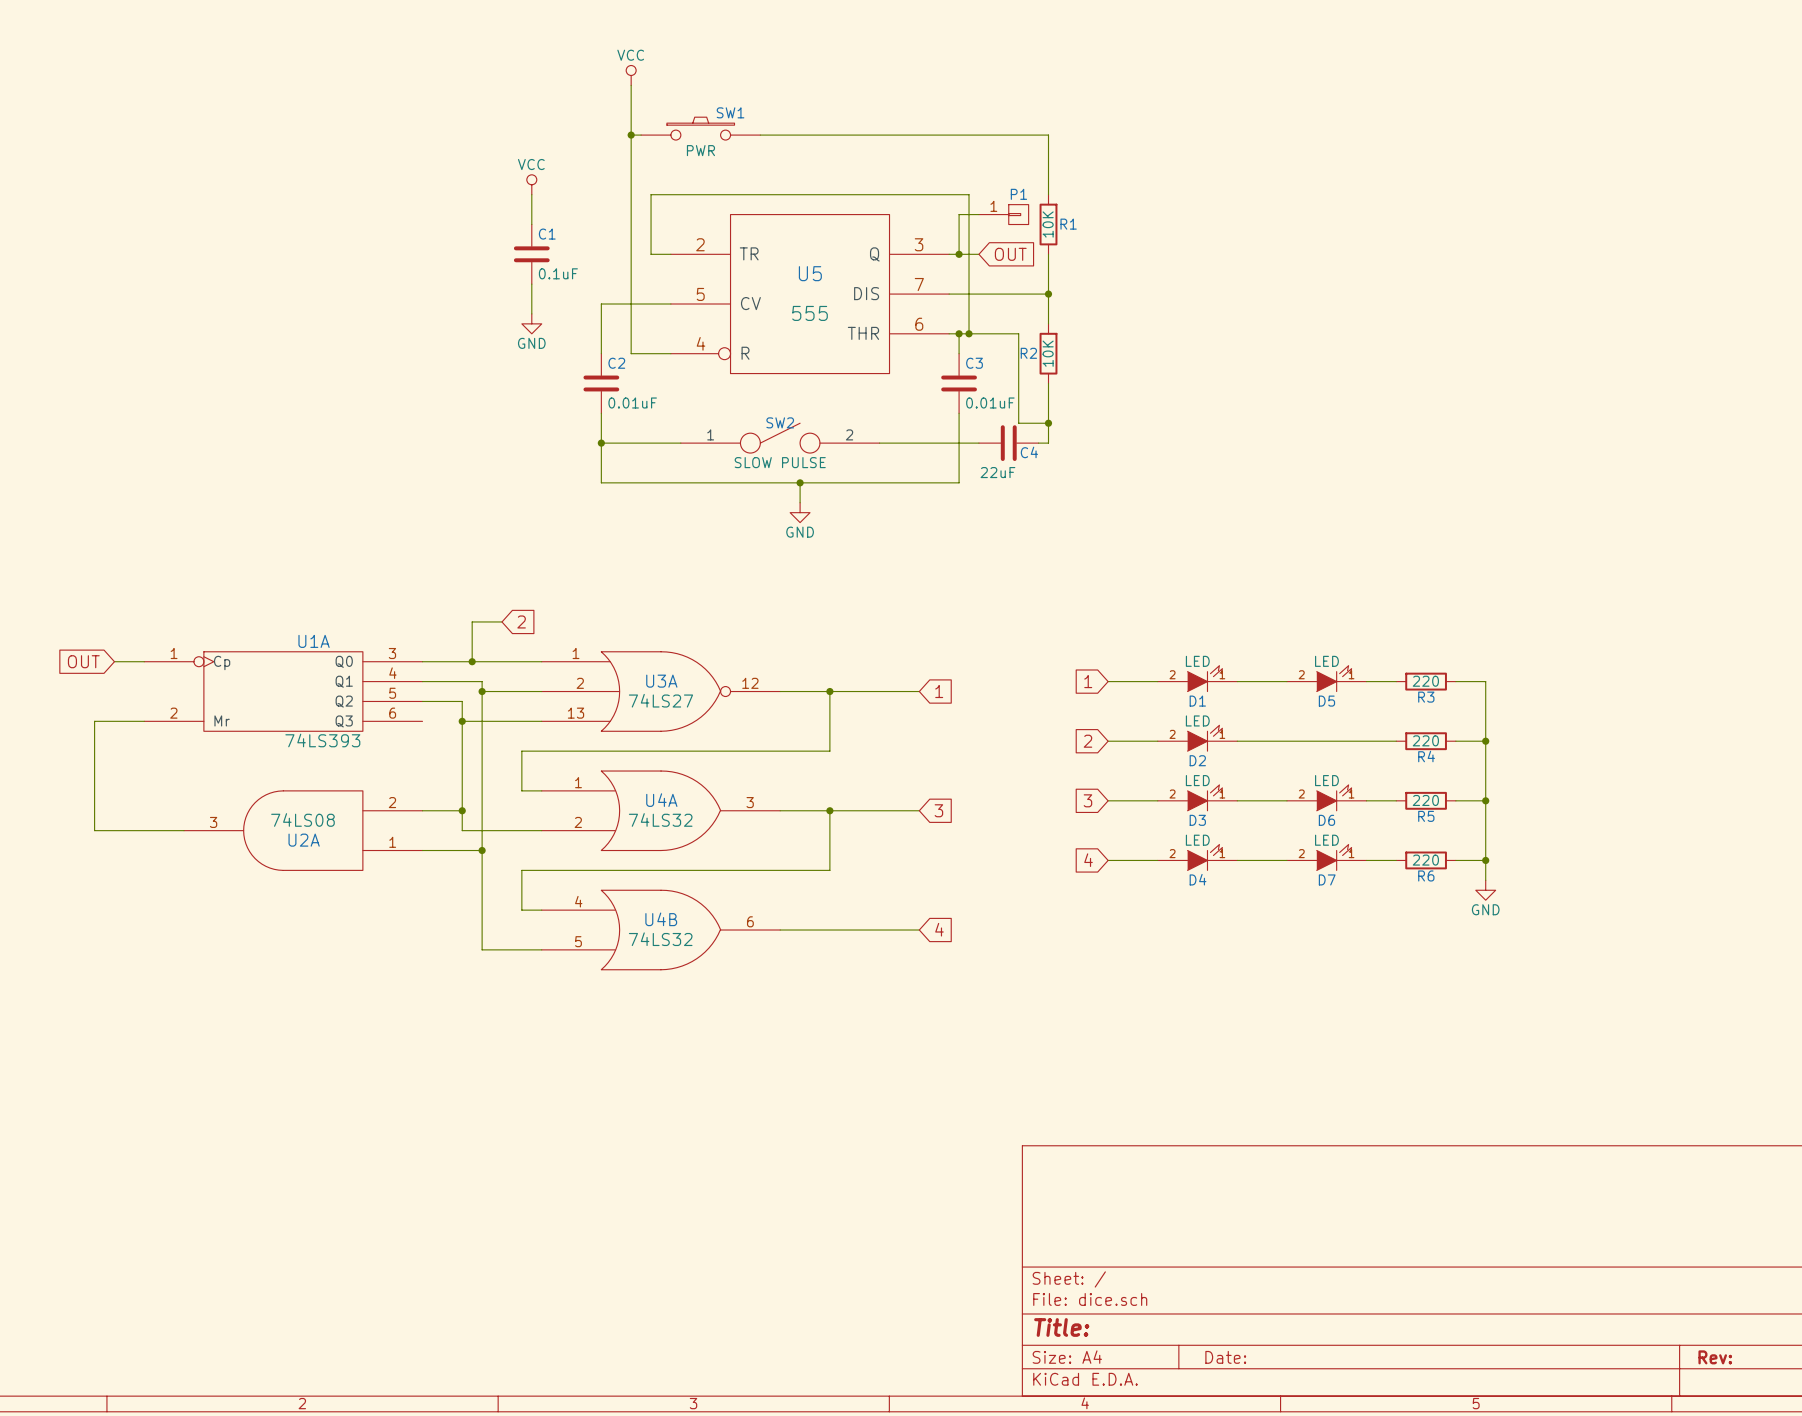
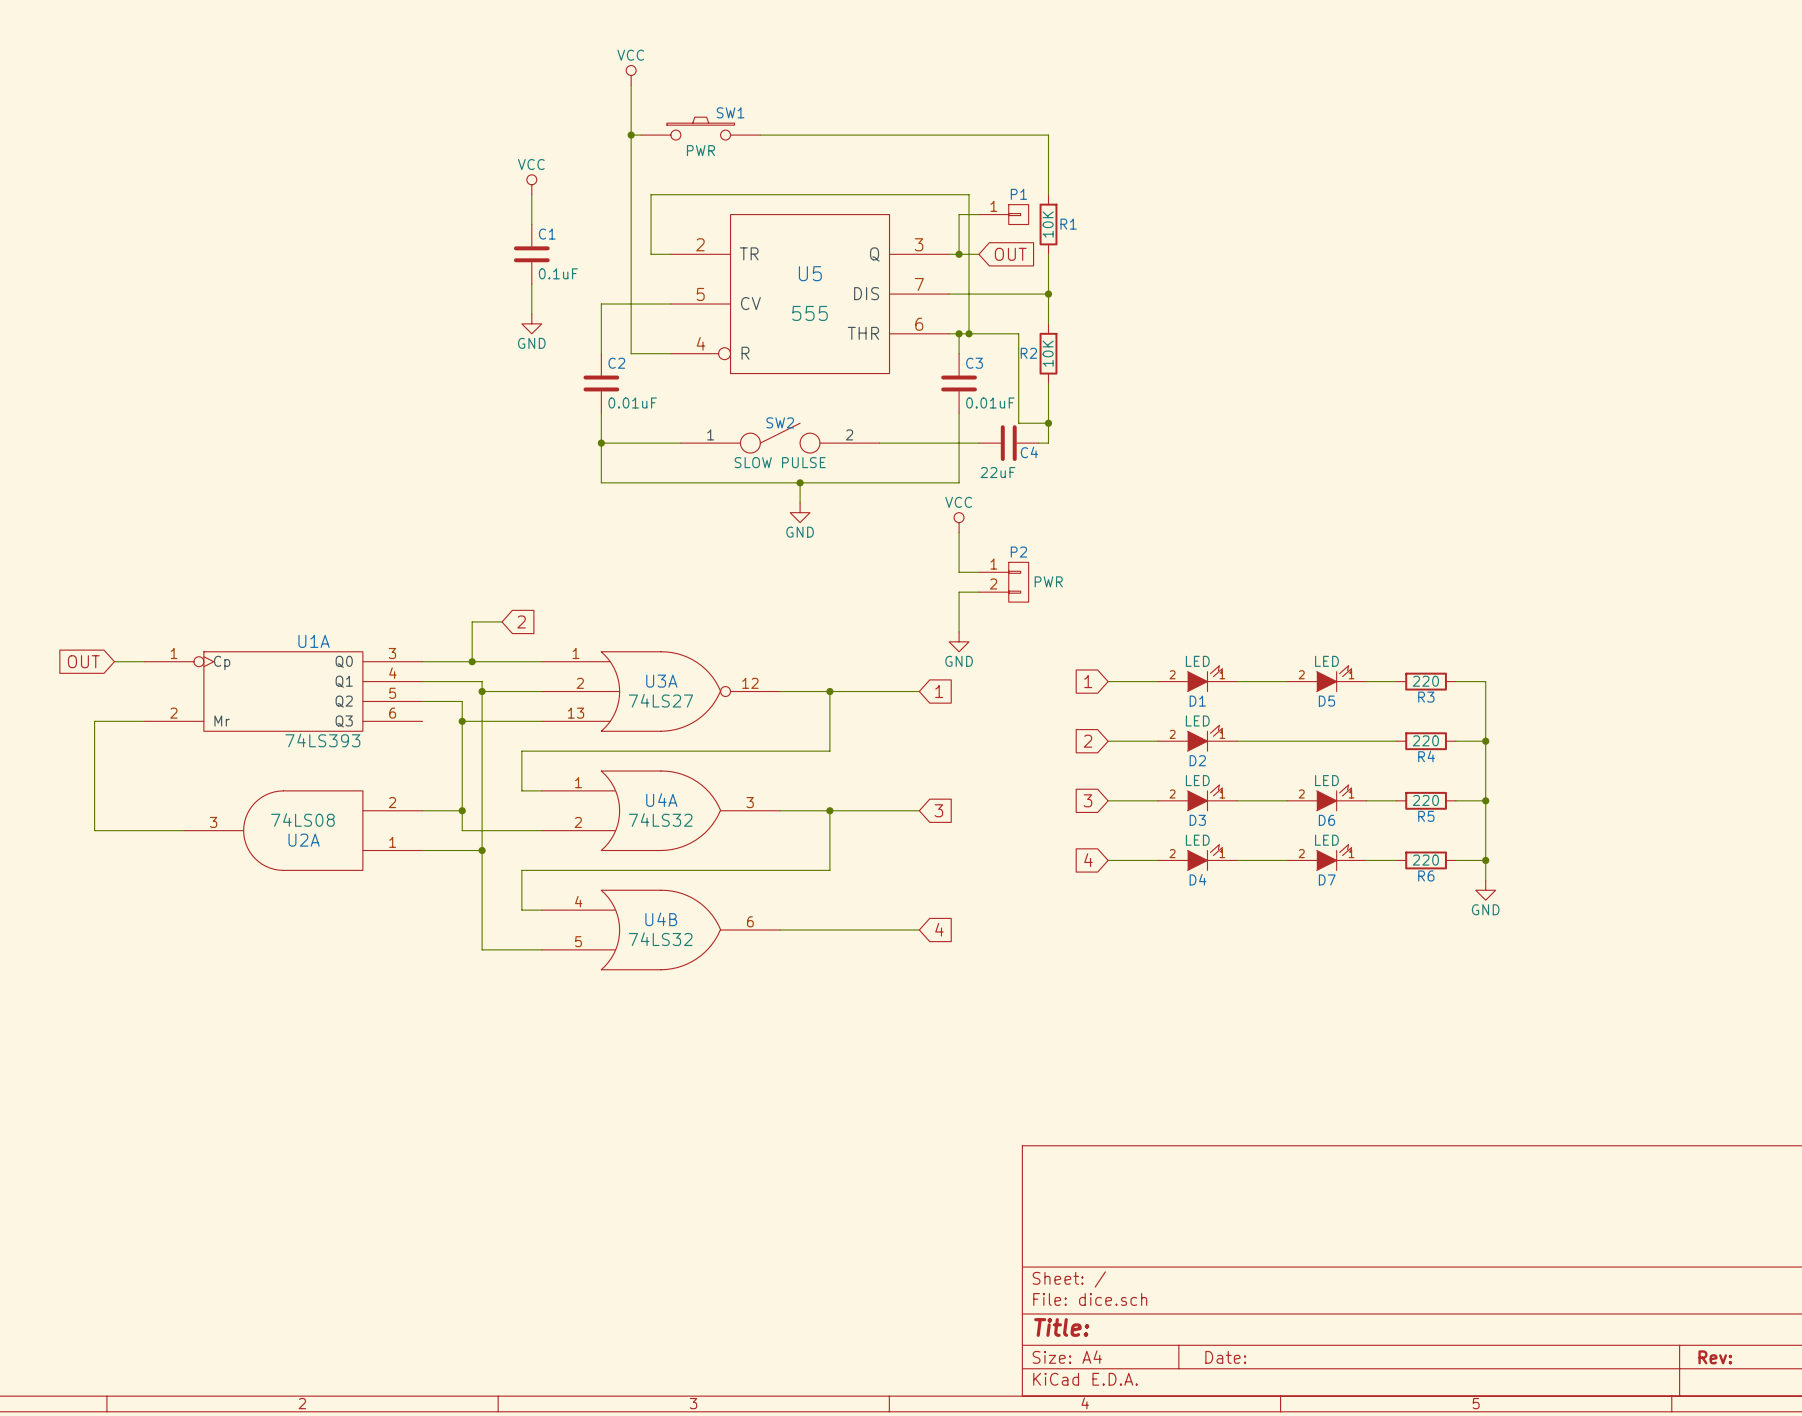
power symbol: none -> VCC (959, 522)
wire: none -> (959, 532) (959, 572) (978, 572)
P2: none -> PWR (1003, 582)
wire: none -> (978, 592) (959, 592) (959, 631)
power symbol: none -> GND (959, 641)

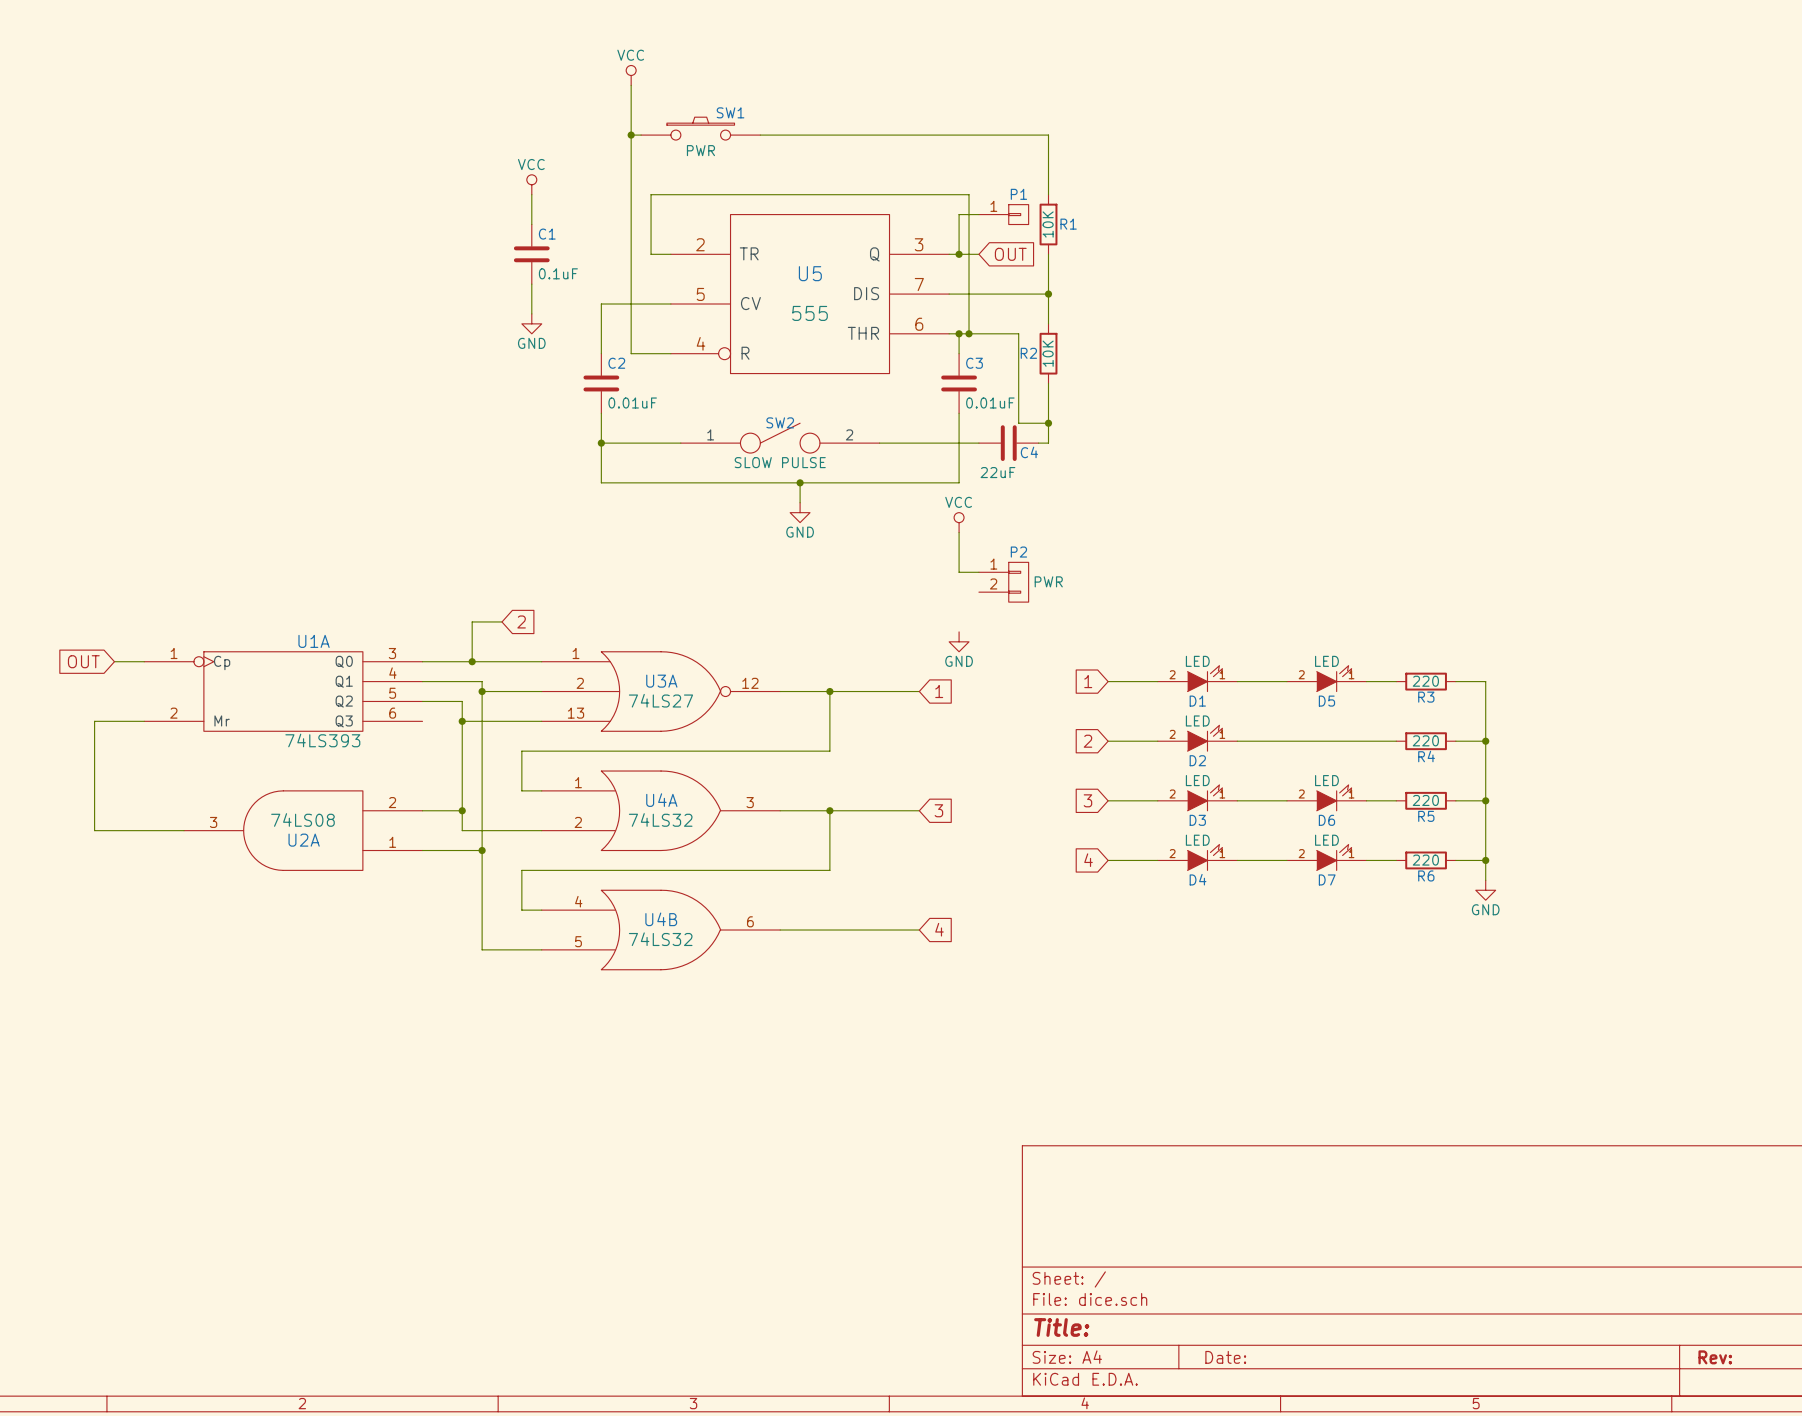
wire: (978, 592) (959, 592) (959, 631) -> none

